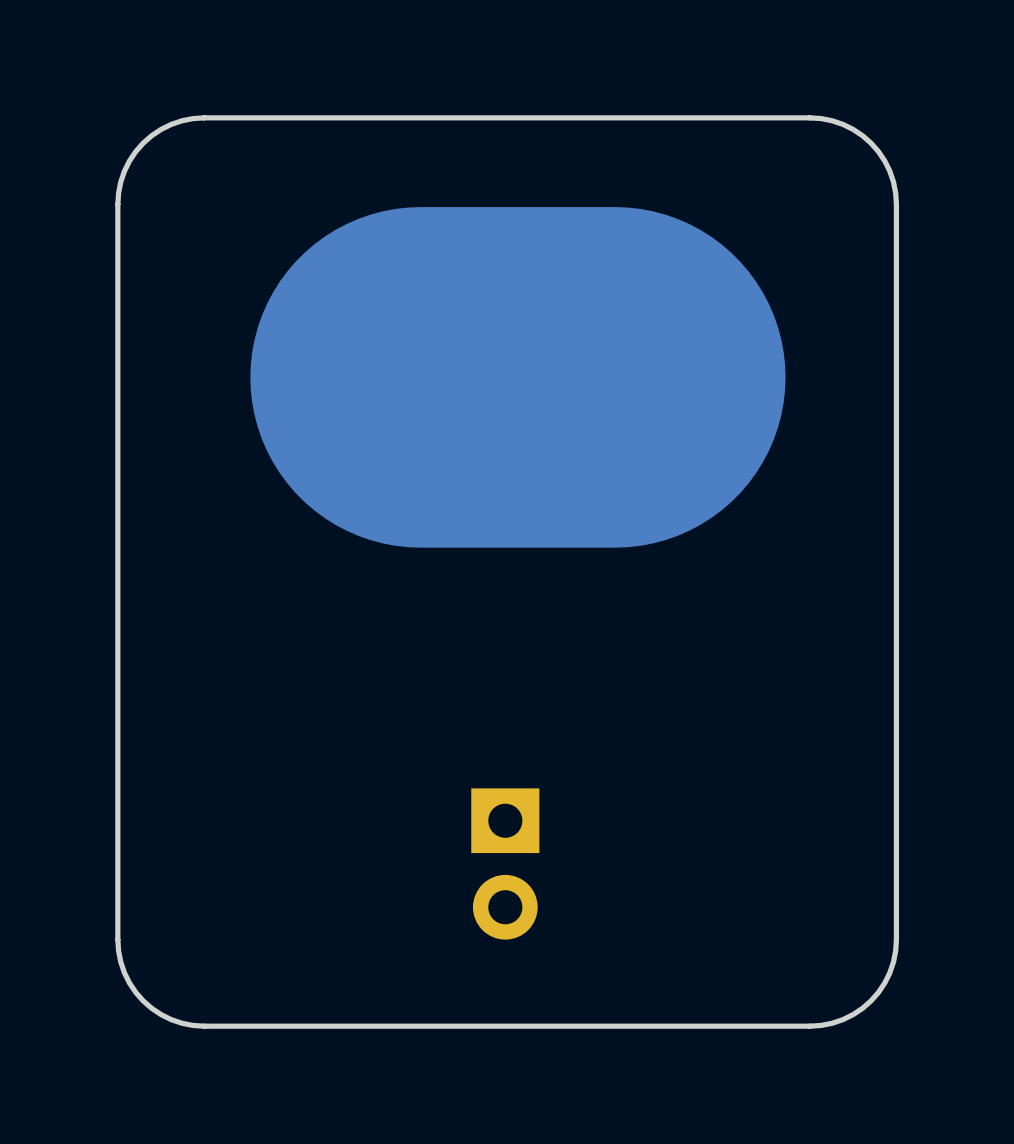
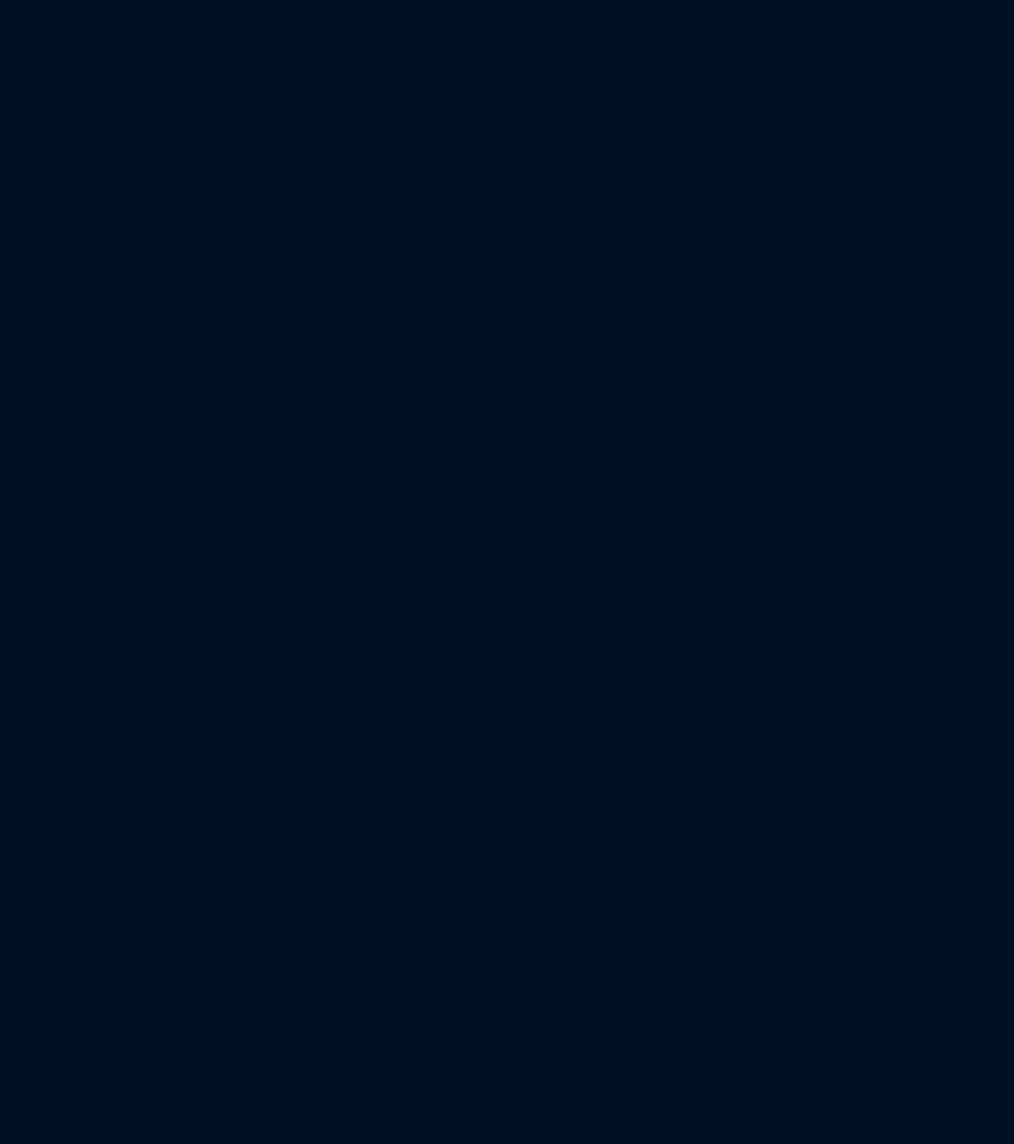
board edge: (809, 117) (204, 117) (181, 120) (161, 129) (143, 143) (129, 161) (120, 181) (117, 204) (118, 950) (124, 972) (143, 1000) (171, 1019) (204, 1026) -> none
board edge: (809, 117) (843, 124) (871, 143) (884, 161) (895, 193) (896, 939) (893, 962) (884, 982) (871, 1000) (853, 1014) (832, 1023) (809, 1026) (204, 1026) -> none
track: (615, 377) (420, 377) -> none
part: (505, 863) -> none

